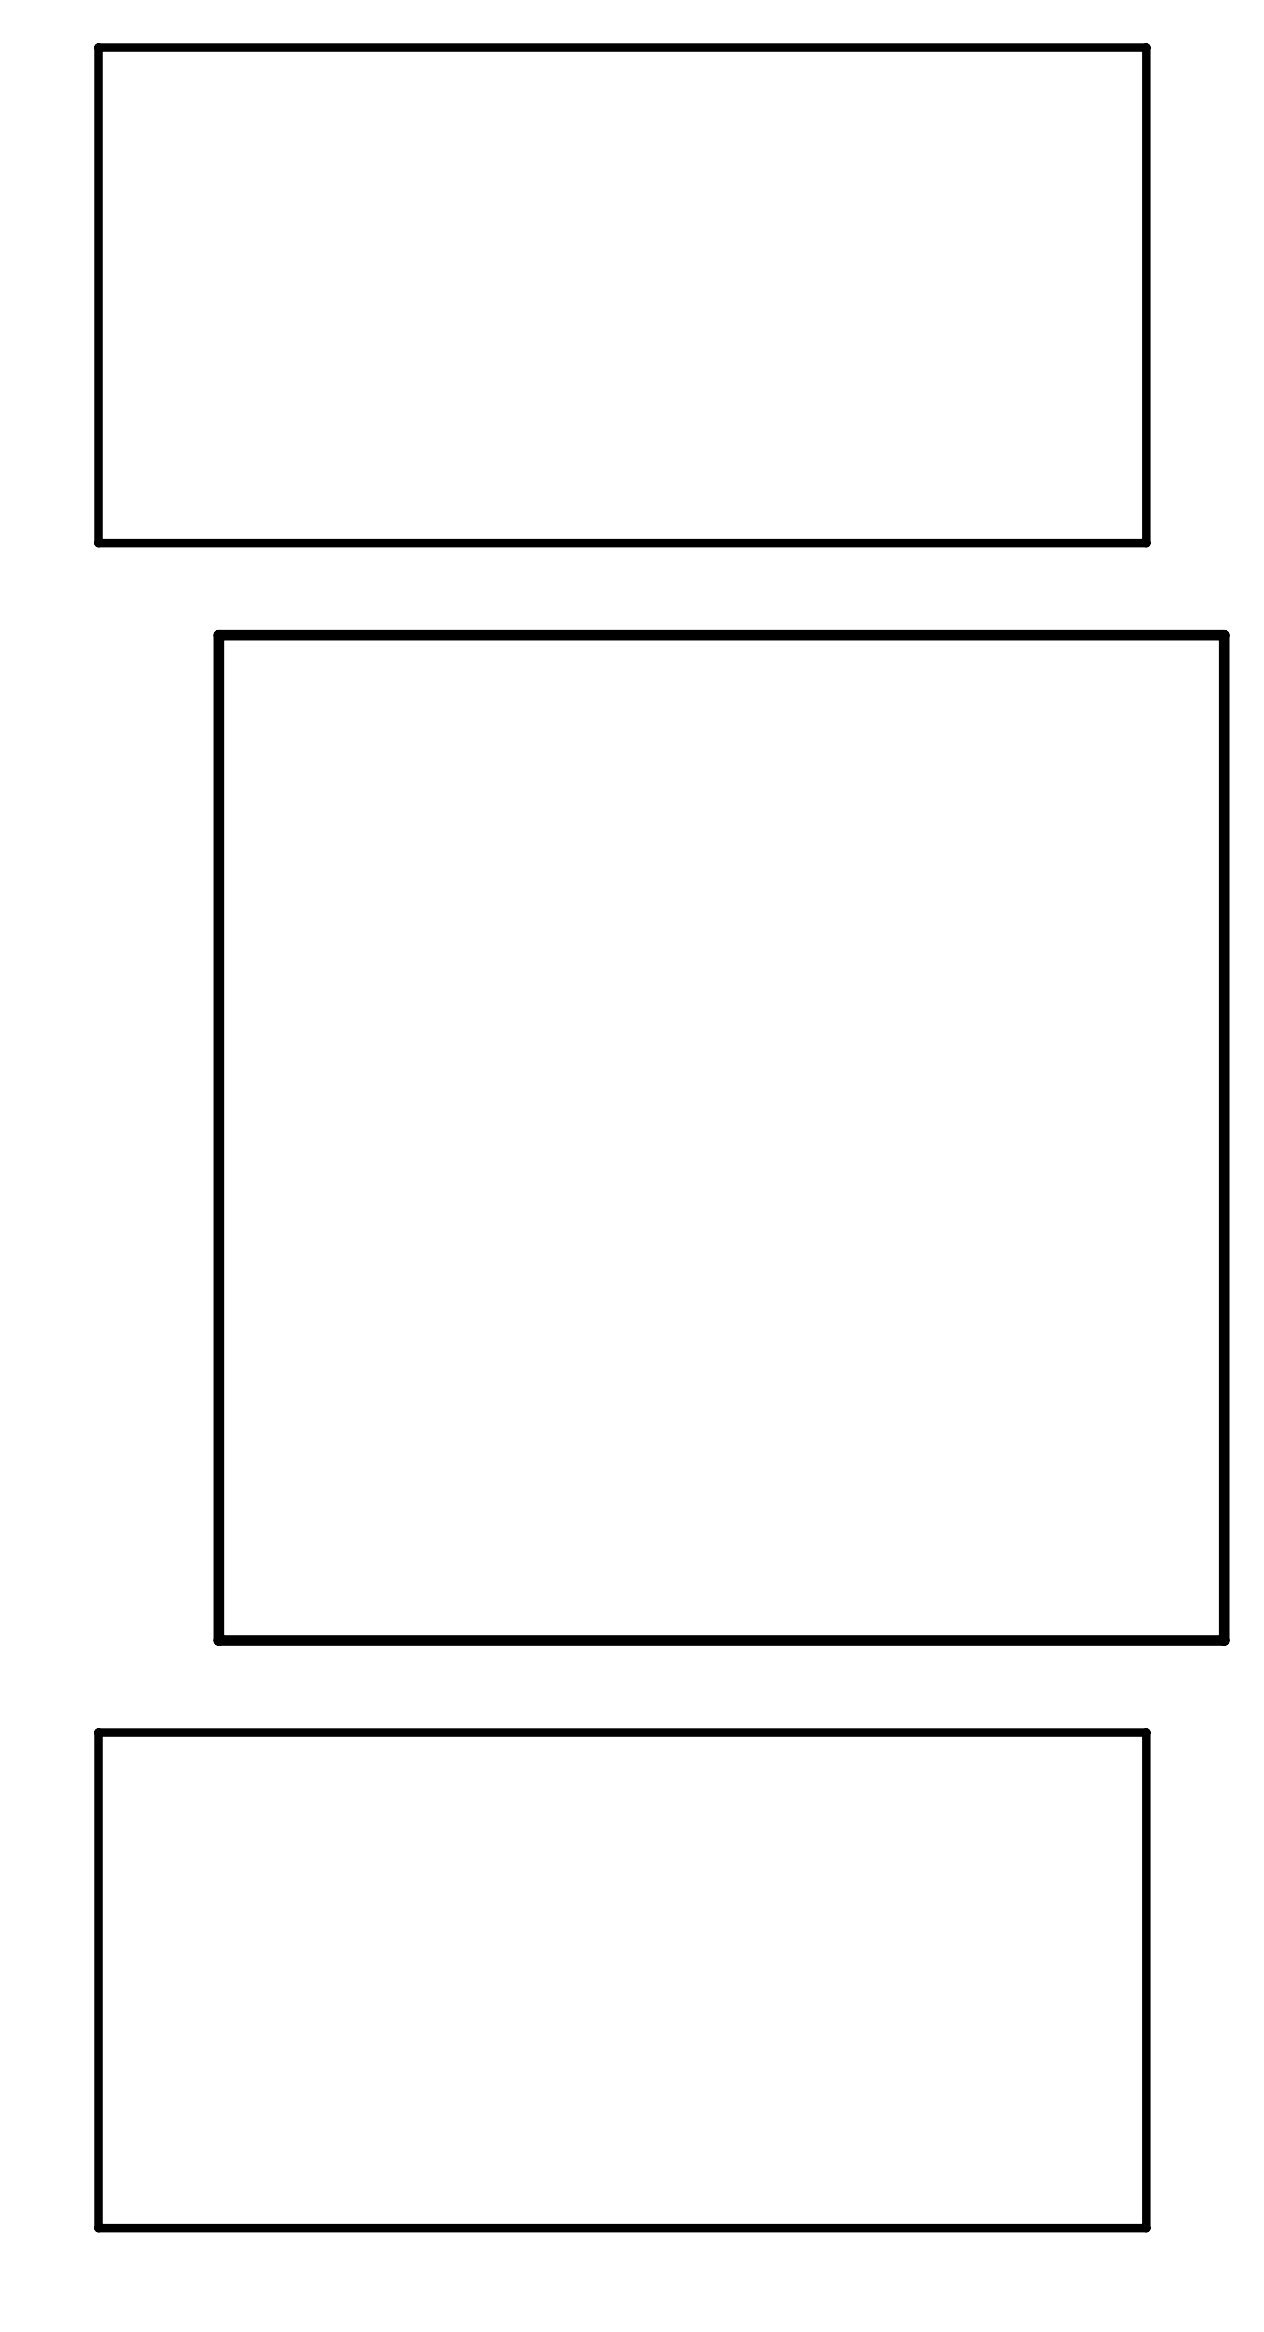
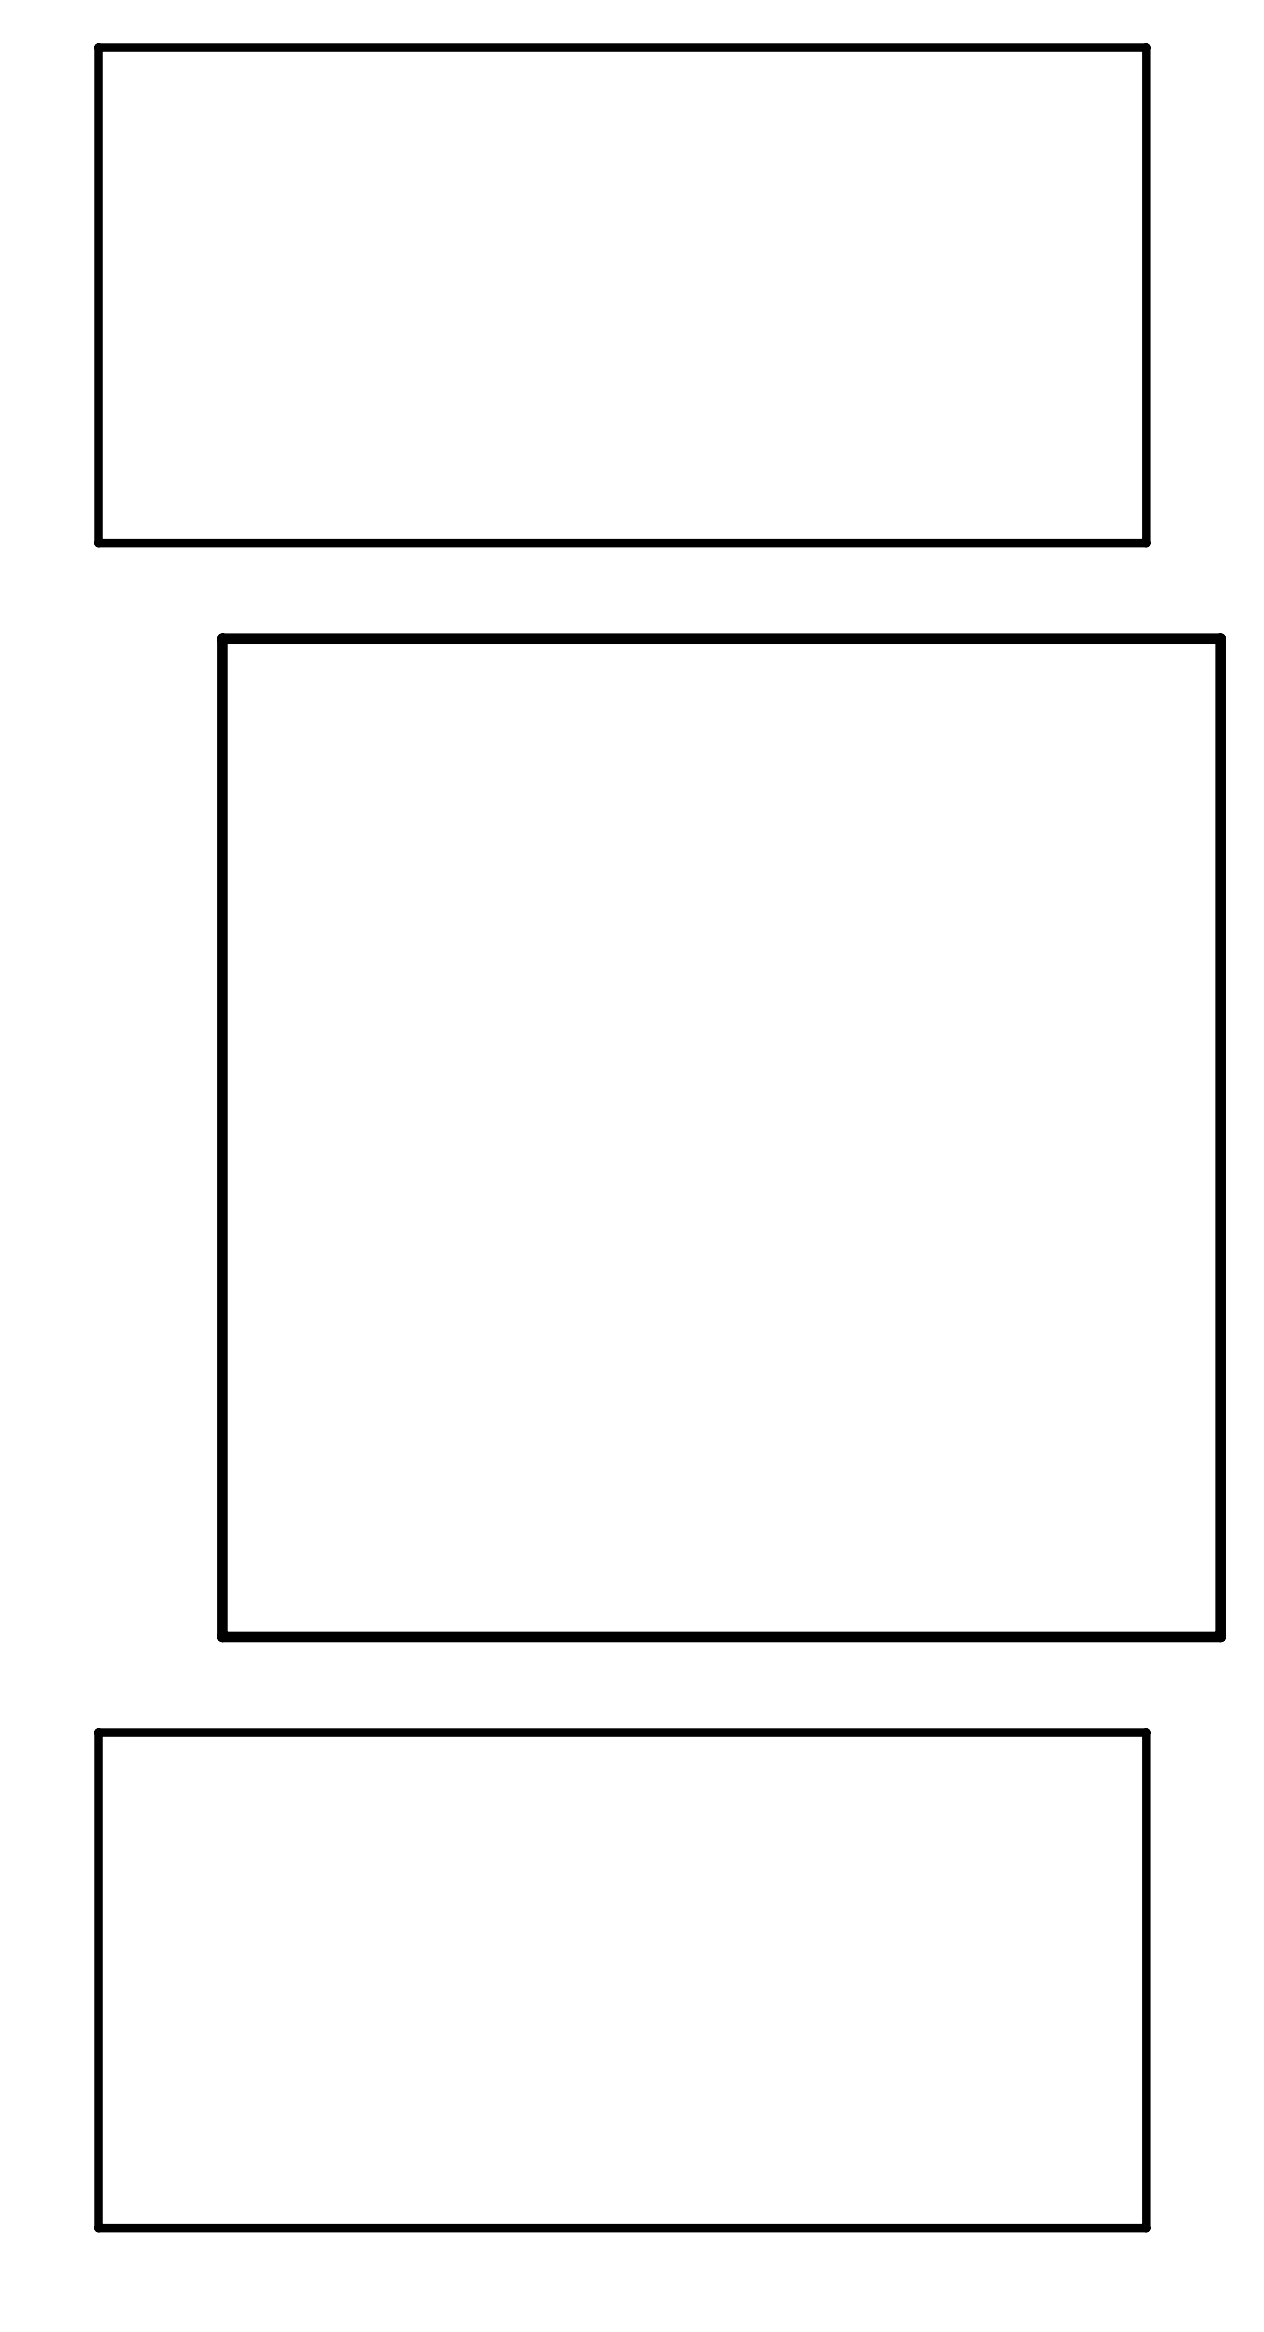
drawing shape: [94, 43, 1230, 2233] -> [94, 43, 1226, 2233]

